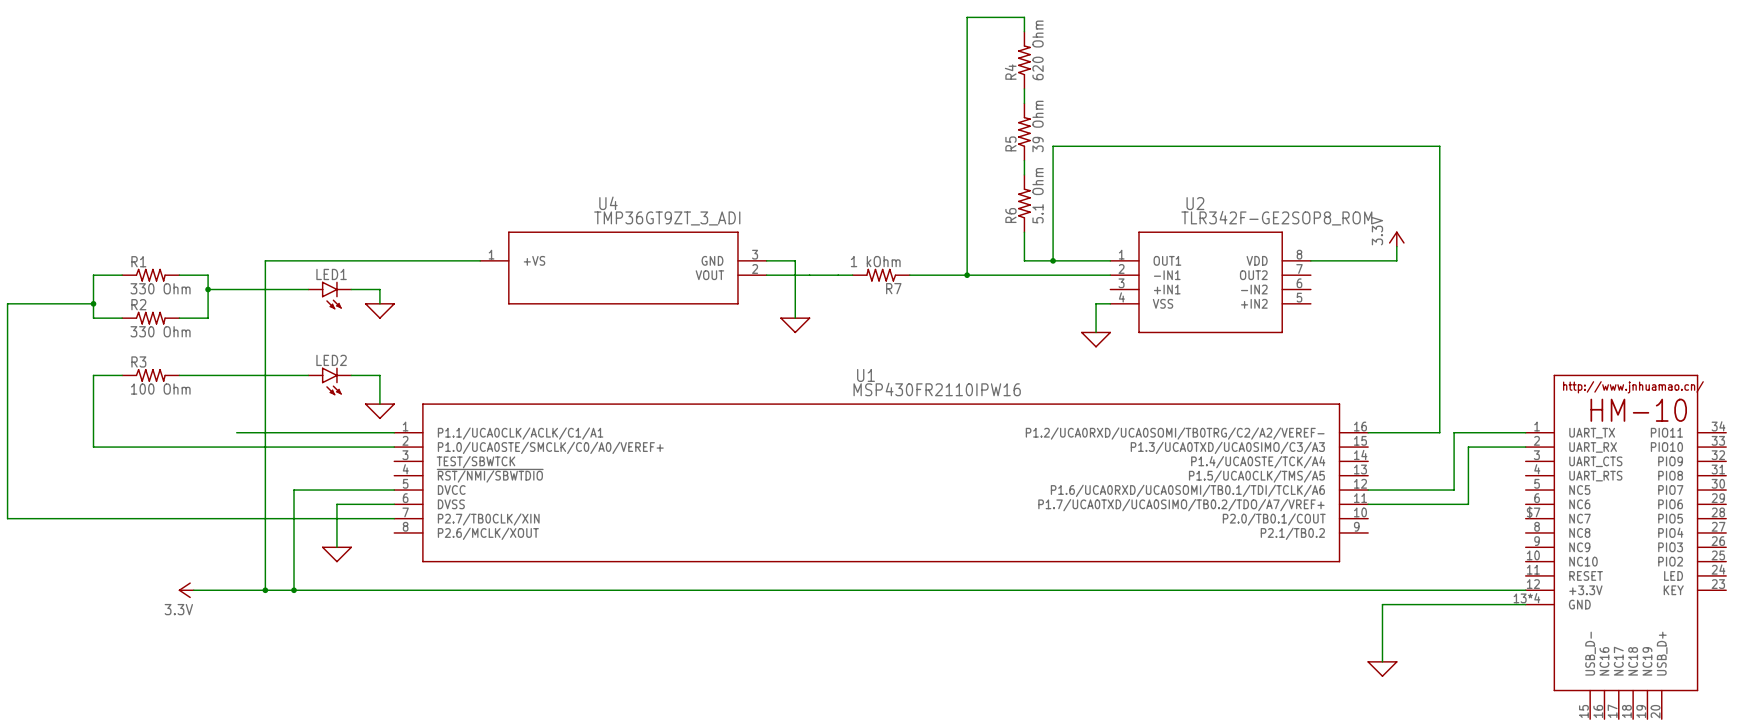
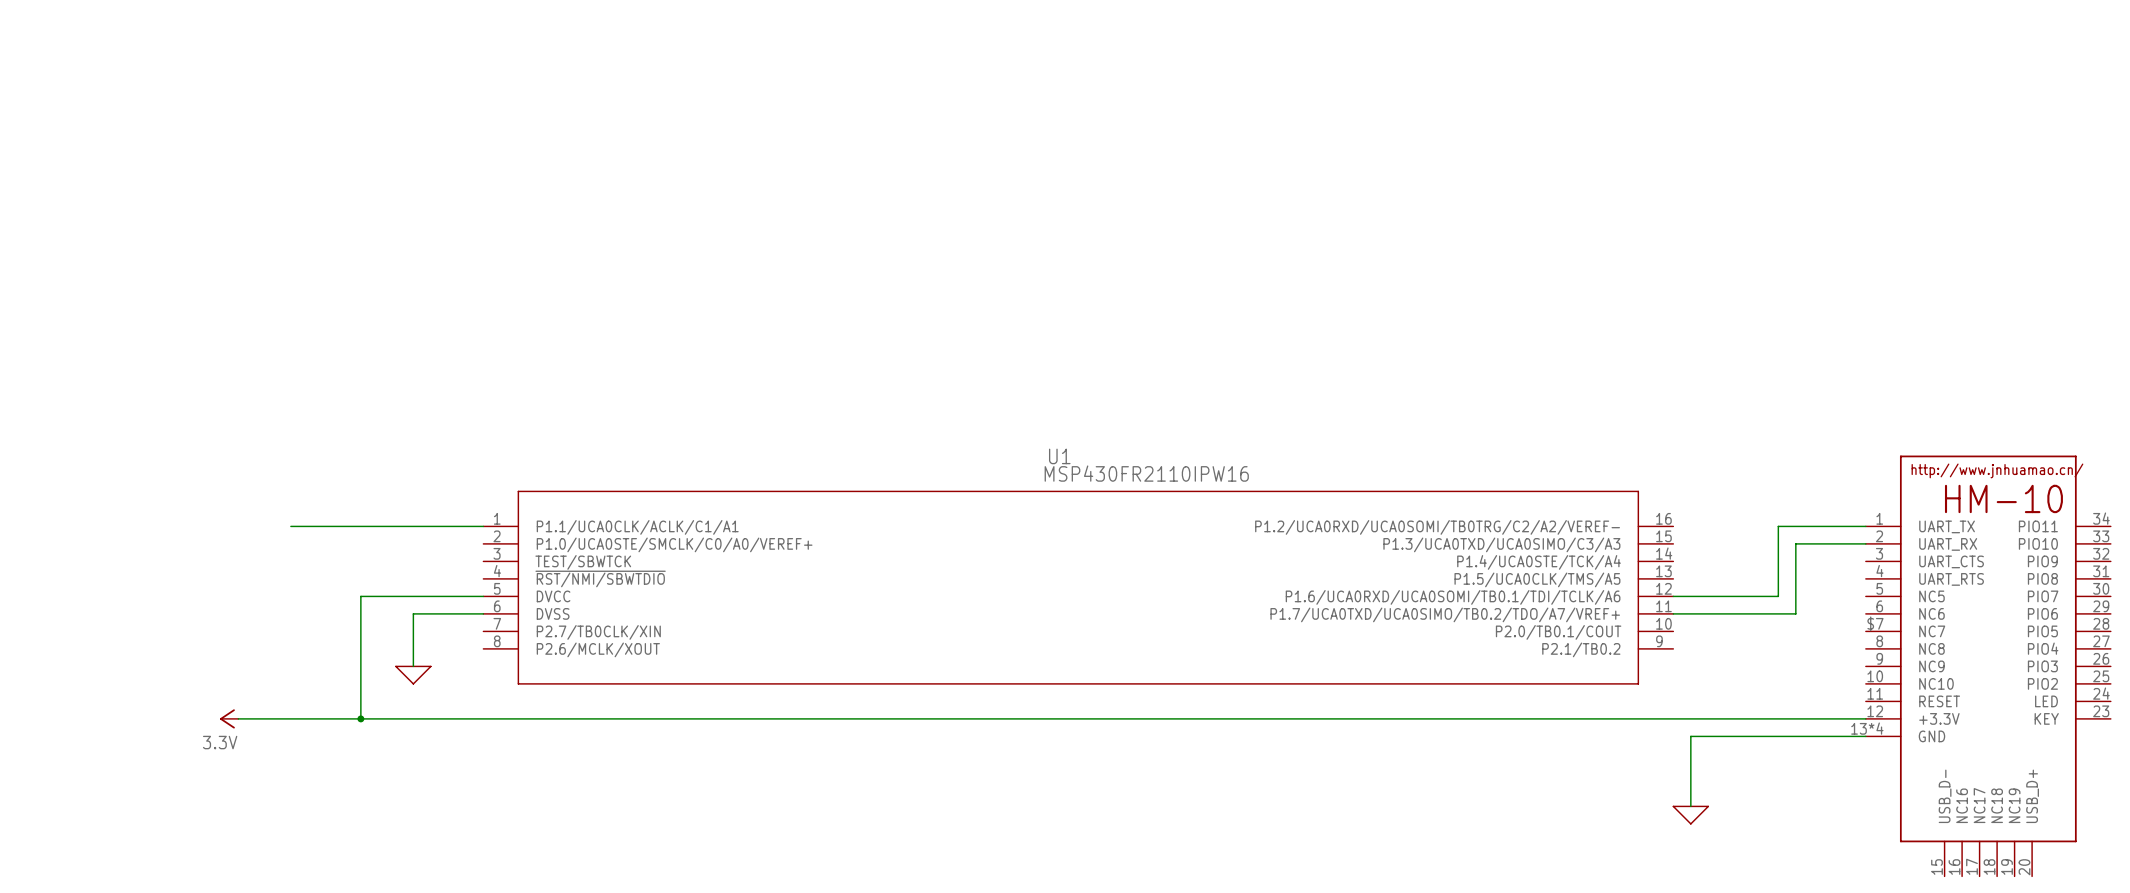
wire: (1024, 31) (1024, 17) (967, 17) (967, 275) -> none
R4: 620 Ohm (1024, 60) -> none
wire: (1024, 89) (1024, 103) -> none
R5: 39 Ohm (1024, 131) -> none
wire: (1024, 160) (1024, 174) -> none
R6: 5.1 Ohm (1024, 203) -> none
wire: (1024, 232) (1024, 260) (1110, 260) -> none
power symbol: 3.3V (1396, 239) -> none
wire: (1396, 246) (1396, 260) (1310, 260) -> none
wire: (480, 260) (265, 260) (265, 590) -> none
wire: (766, 260) (795, 260) (795, 318) -> none
wire: (1053, 260) (1053, 146) (1439, 146) (1439, 432) (1368, 432) -> none
junction: (1053, 260) -> none
U4: TMP36GT9ZT_3_ADI (623, 268) -> none
wire: (122, 275) (93, 275) (93, 318) (122, 318) -> none
R1: 330 Ohm (150, 275) -> none
wire: (179, 275) (208, 275) (208, 318) (179, 318) -> none
wire: (766, 275) (852, 275) -> none
R7: 1 kOhm (881, 275) -> none
wire: (909, 275) (1110, 275) -> none
junction: (967, 275) -> none
U2: TLR342F-GE2SOP8_ROM (1210, 282) -> none
wire: (208, 289) (308, 289) -> none
junction: (208, 289) -> none
wire: (351, 289) (379, 289) (379, 303) -> none
LED1: (329, 295) -> none
wire: (93, 303) (7, 303) (7, 518) (394, 518) -> none
junction: (93, 303) -> none
wire: (1110, 303) (1096, 303) (1096, 332) -> none
power symbol: (379, 310) -> none
R2: 330 Ohm (150, 318) -> none
power symbol: (795, 325) -> none
power symbol: (1096, 339) -> none
wire: (122, 375) (93, 375) (93, 447) (394, 447) -> none
R3: 100 Ohm (150, 375) -> none
wire: (179, 375) (308, 375) -> none
wire: (351, 375) (379, 375) (379, 404) -> none
LED2: (329, 381) -> none
power symbol: (379, 411) -> none
junction: (265, 590) -> none

